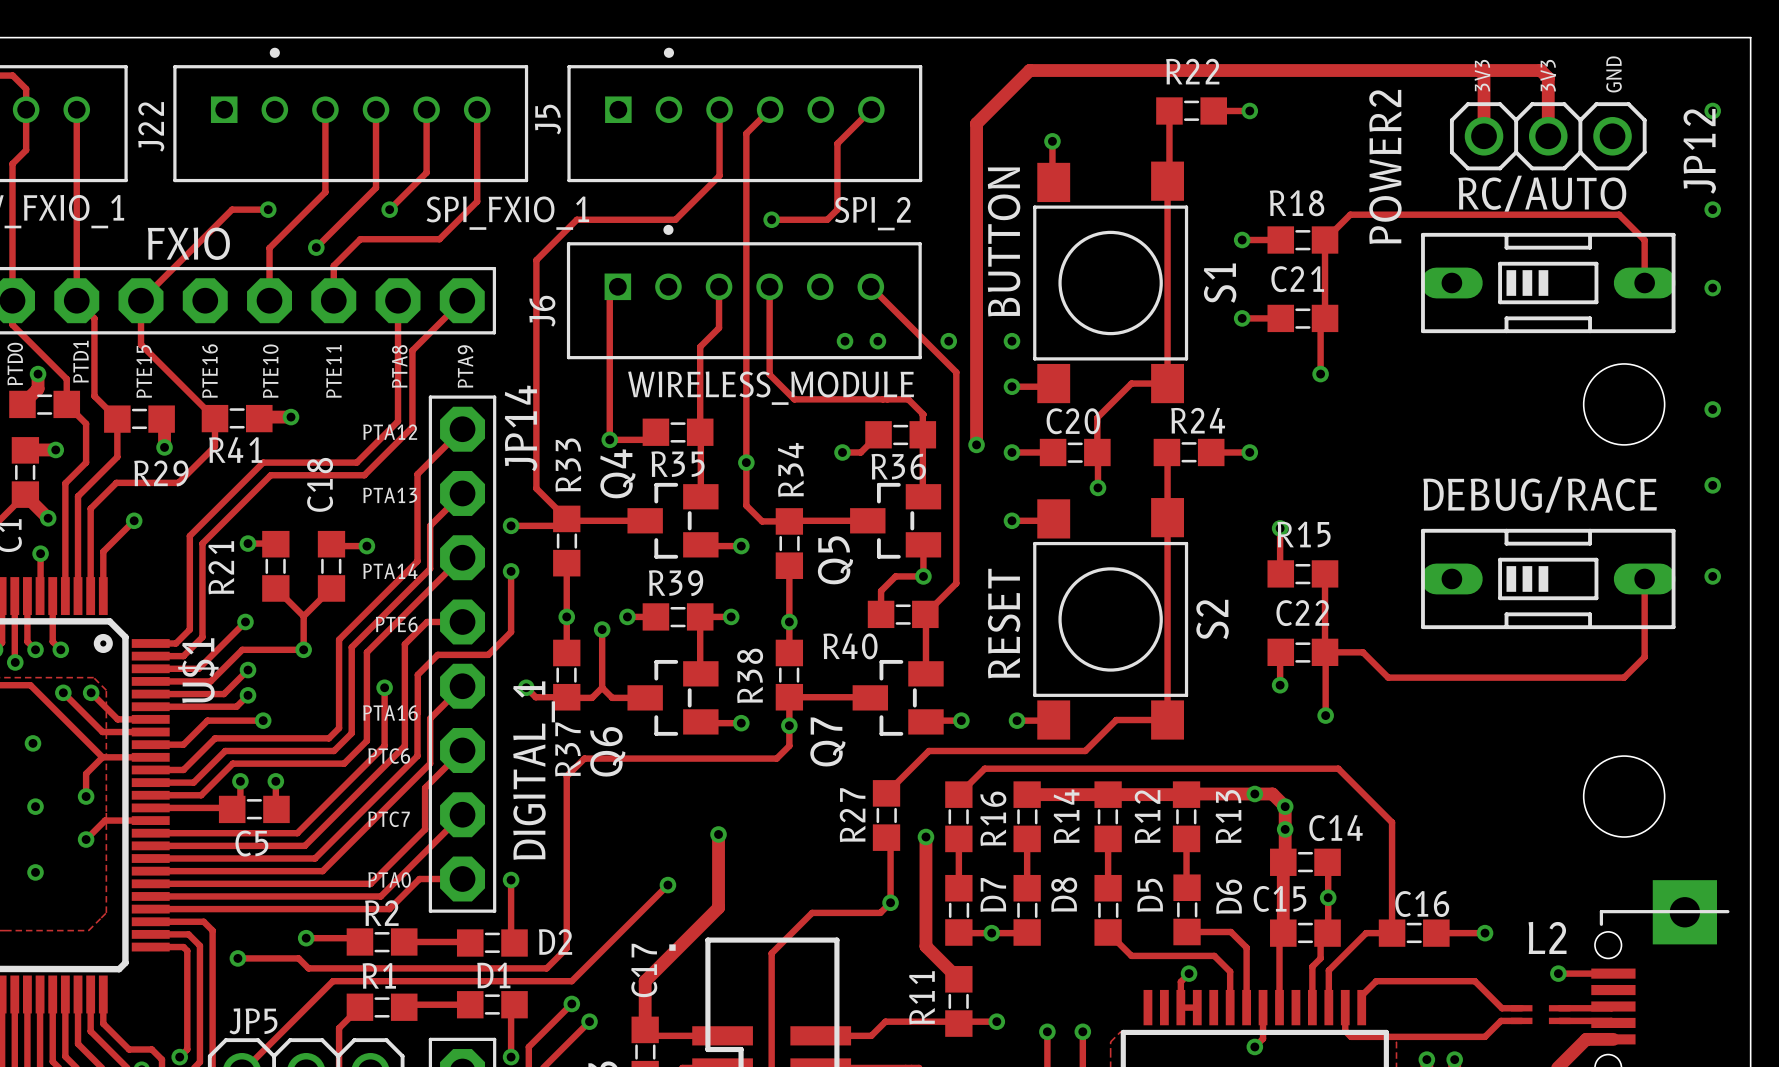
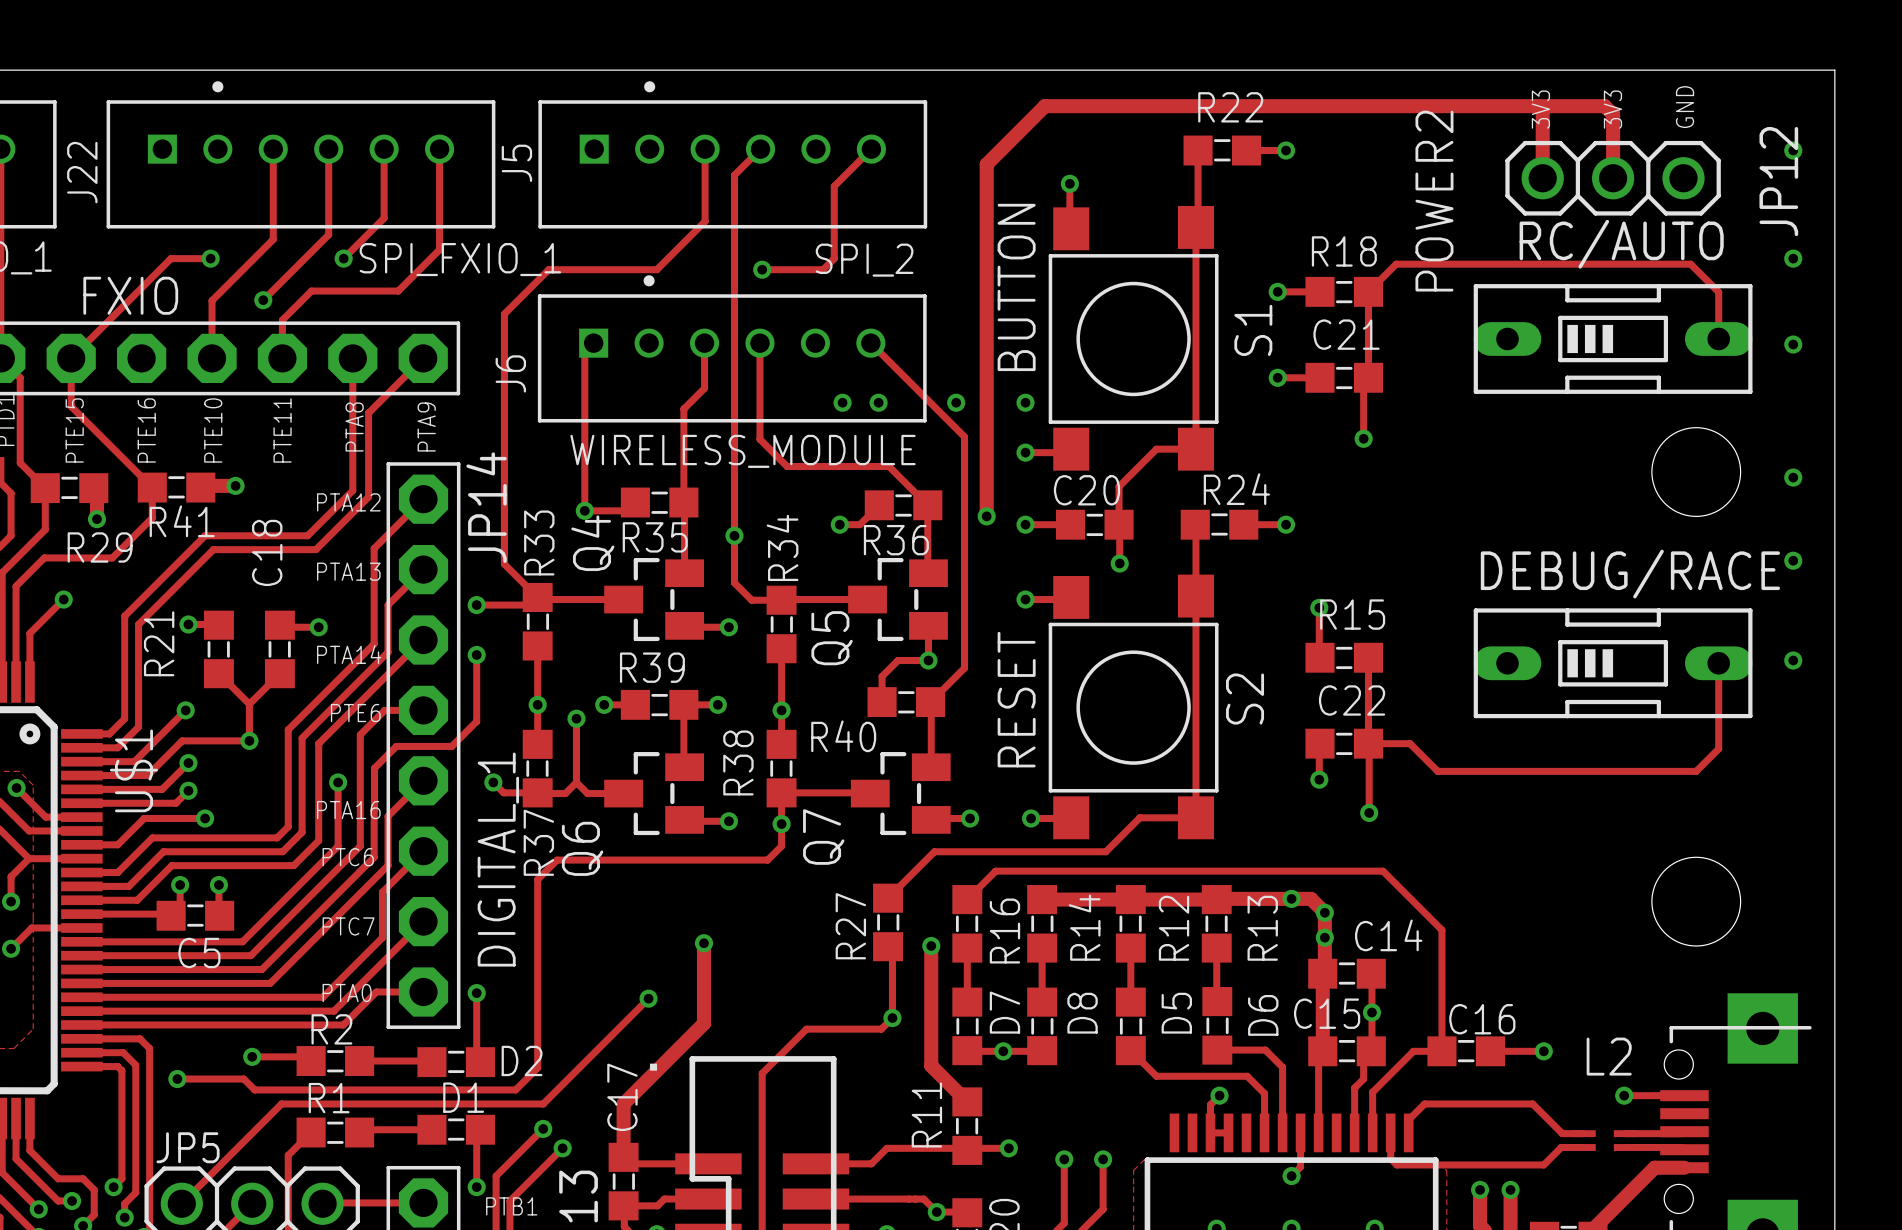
track: (887, 399) (908, 399) (923, 414) (922, 434) -> (889, 466) (927, 505)

